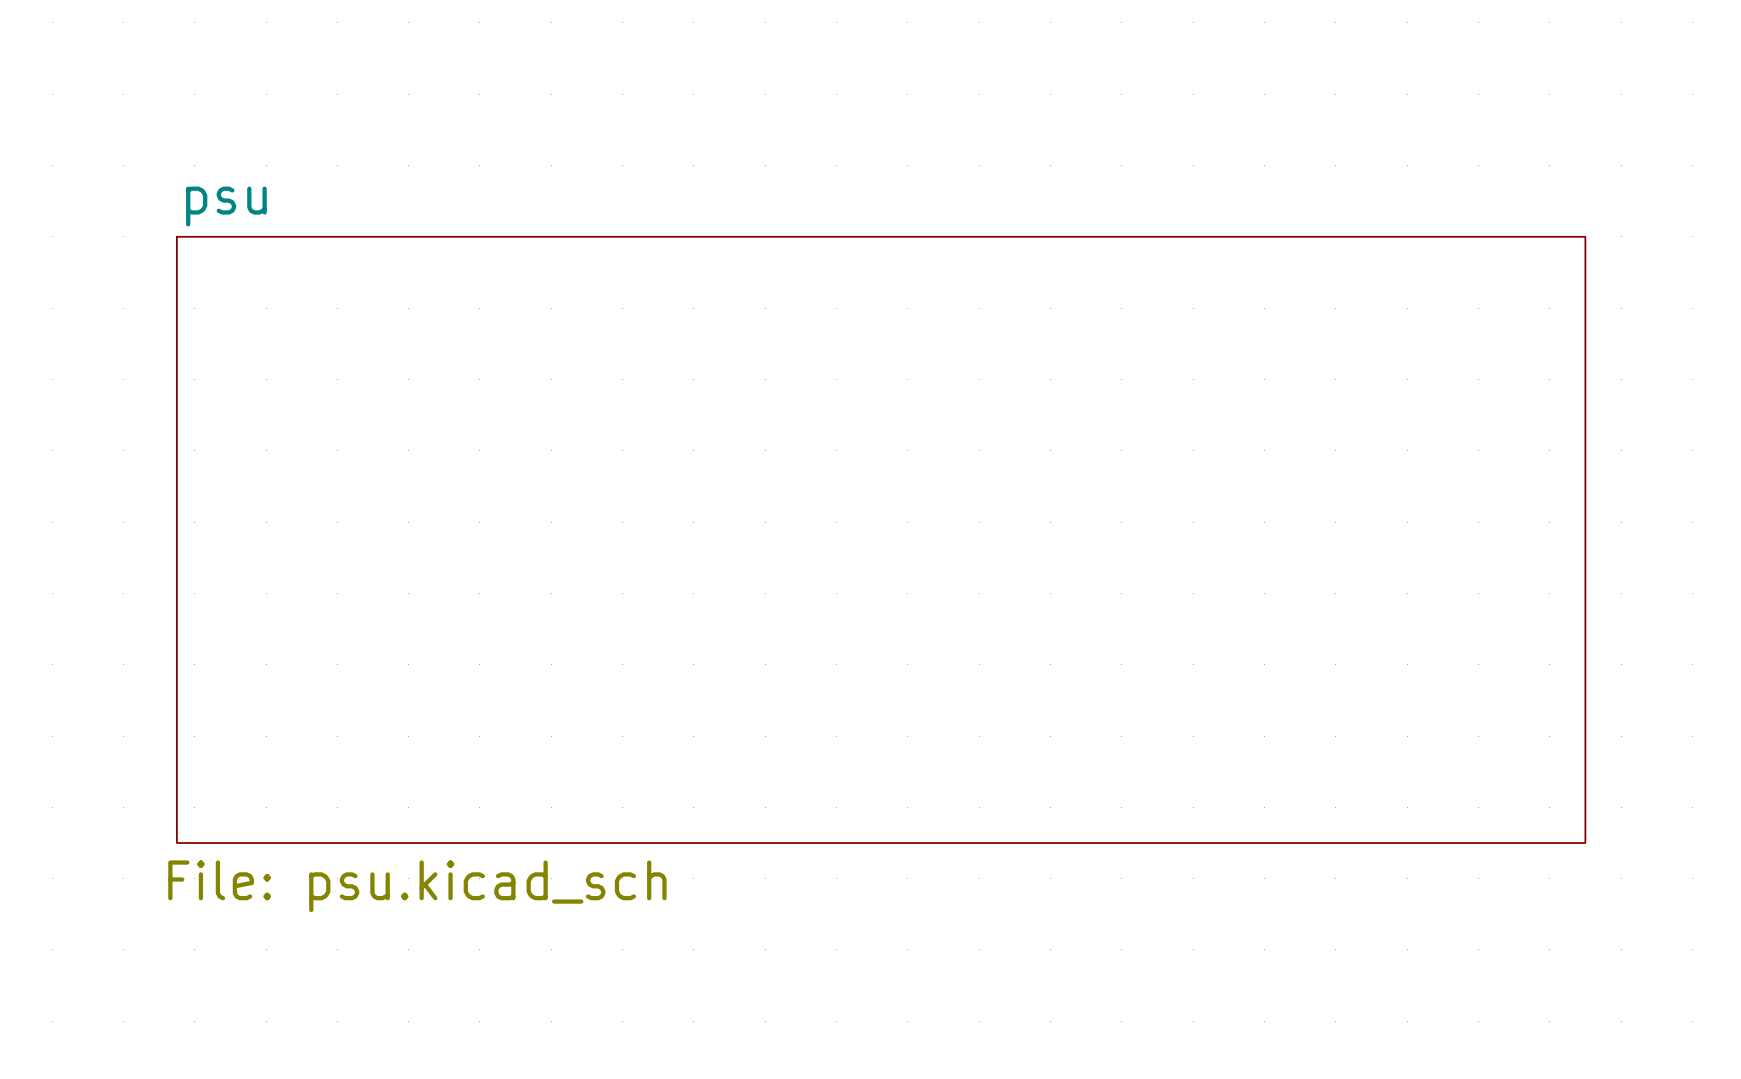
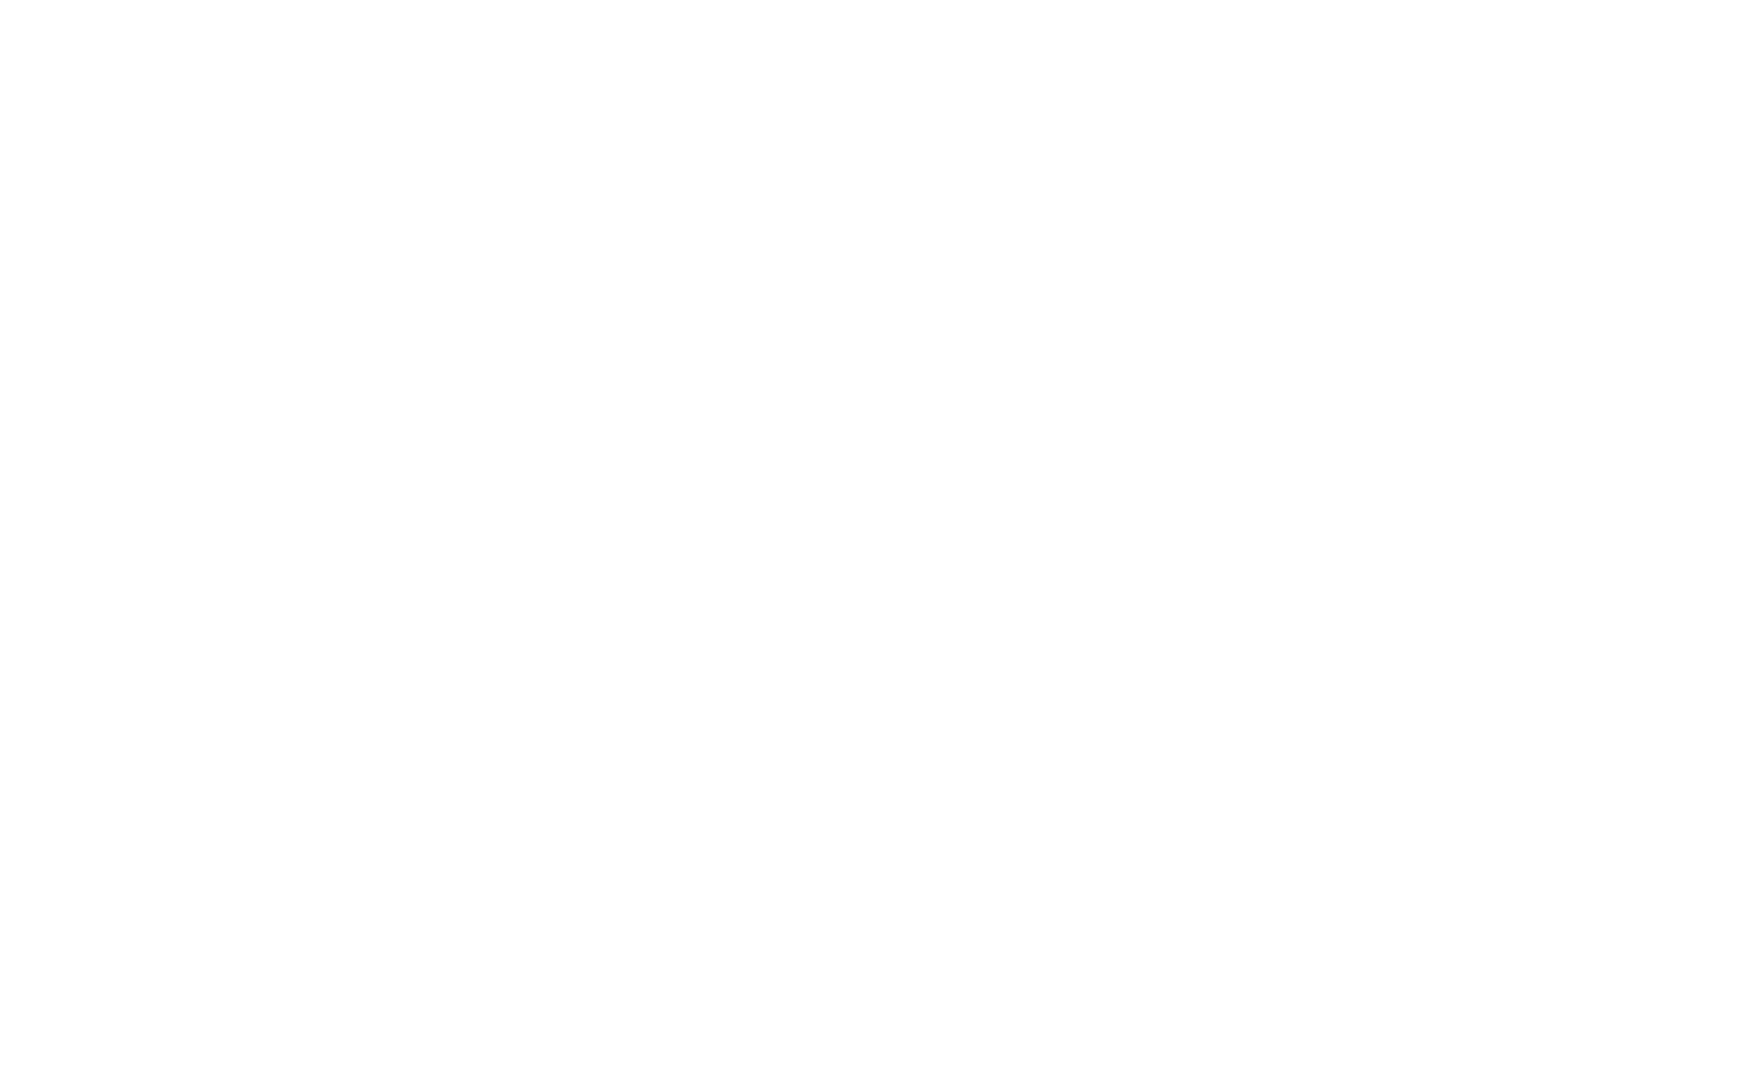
sheet psu: File: psu.kicad_sch (881, 539) -> none

